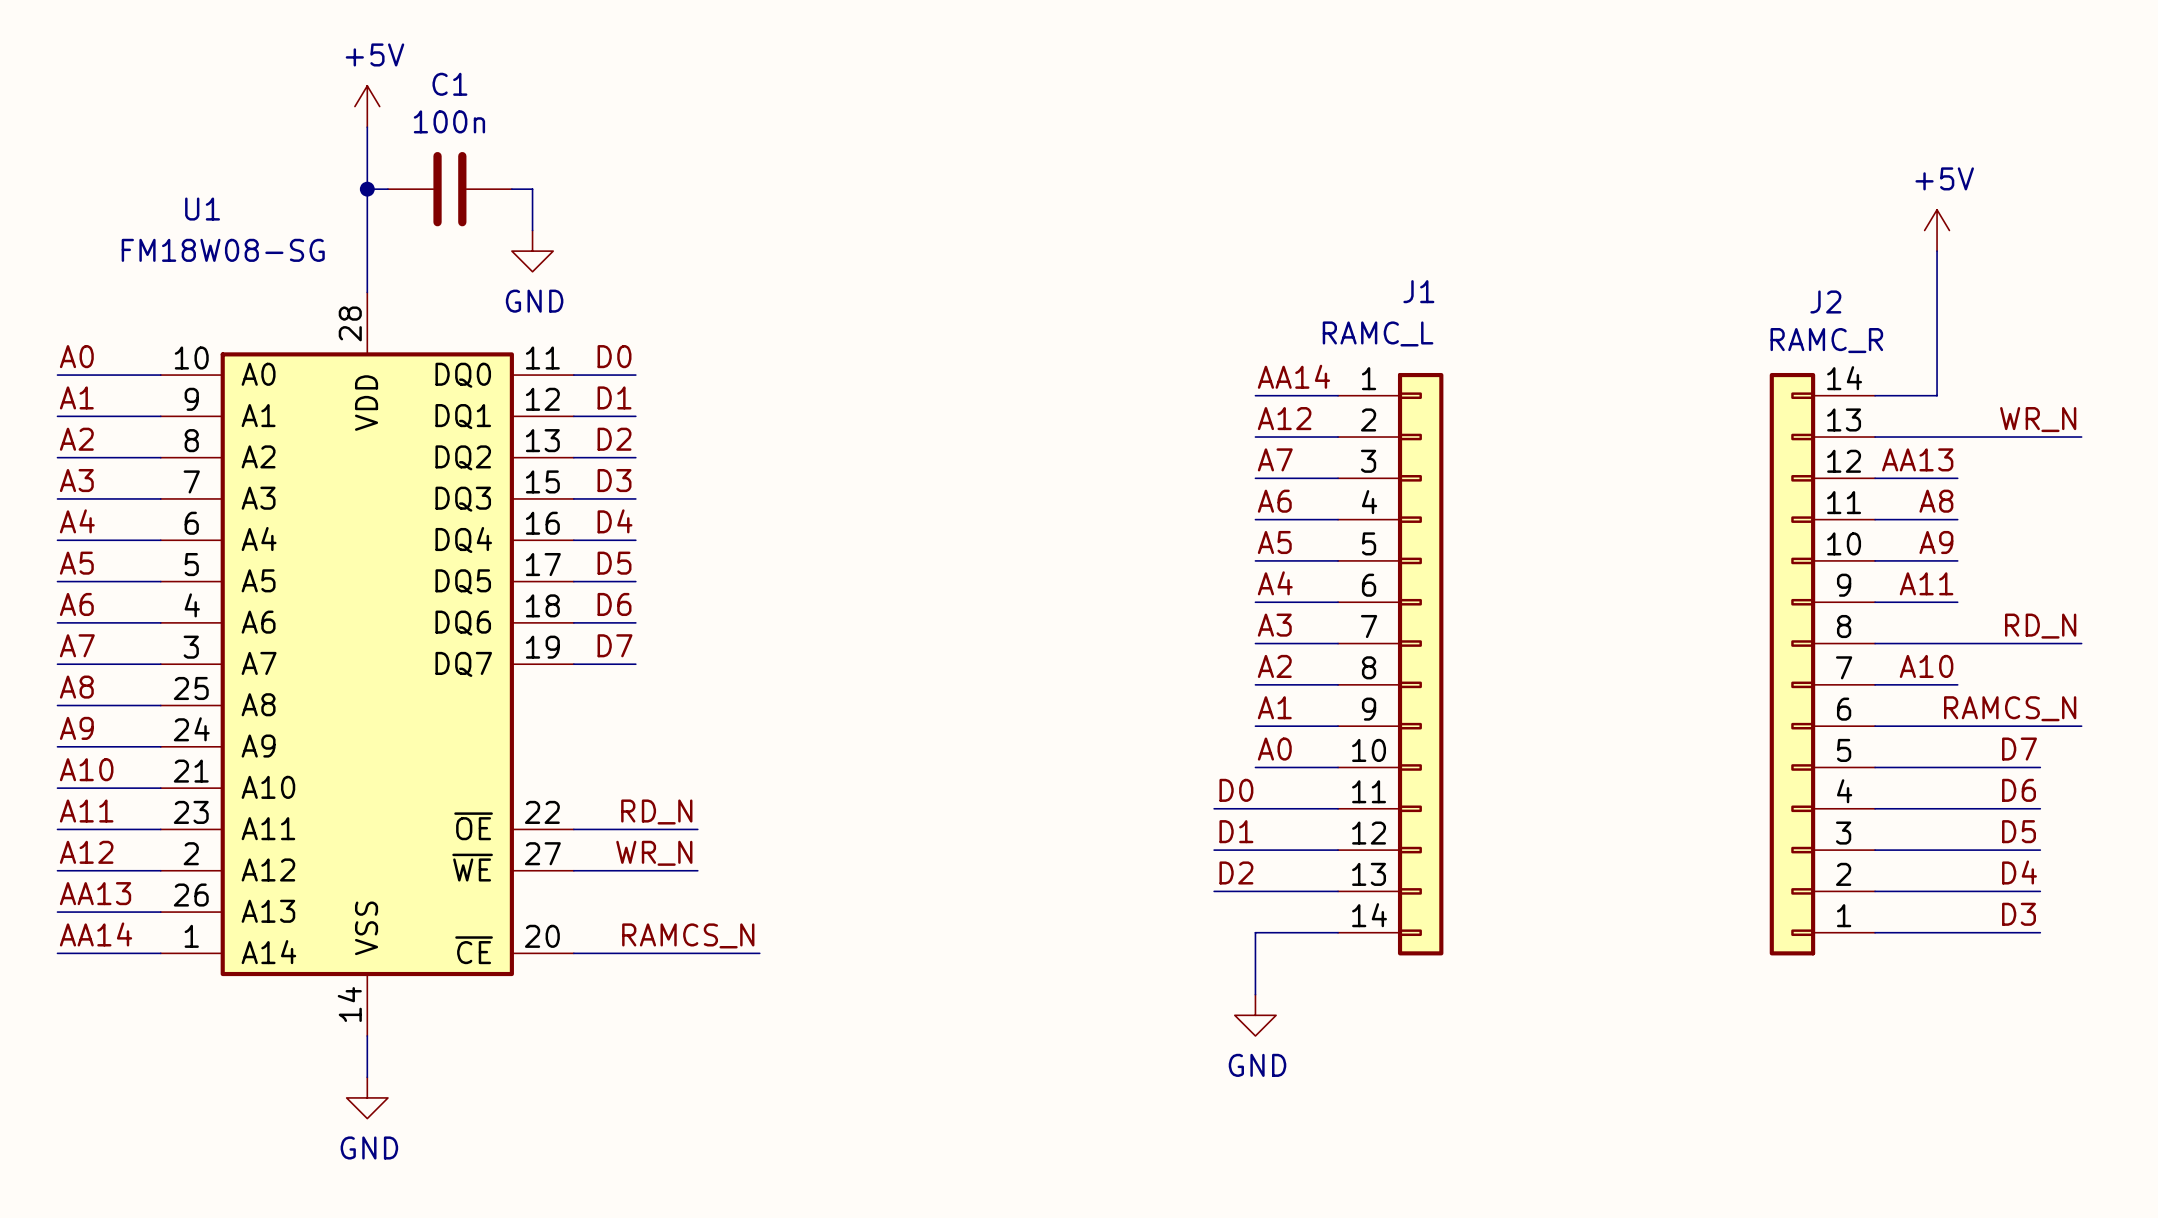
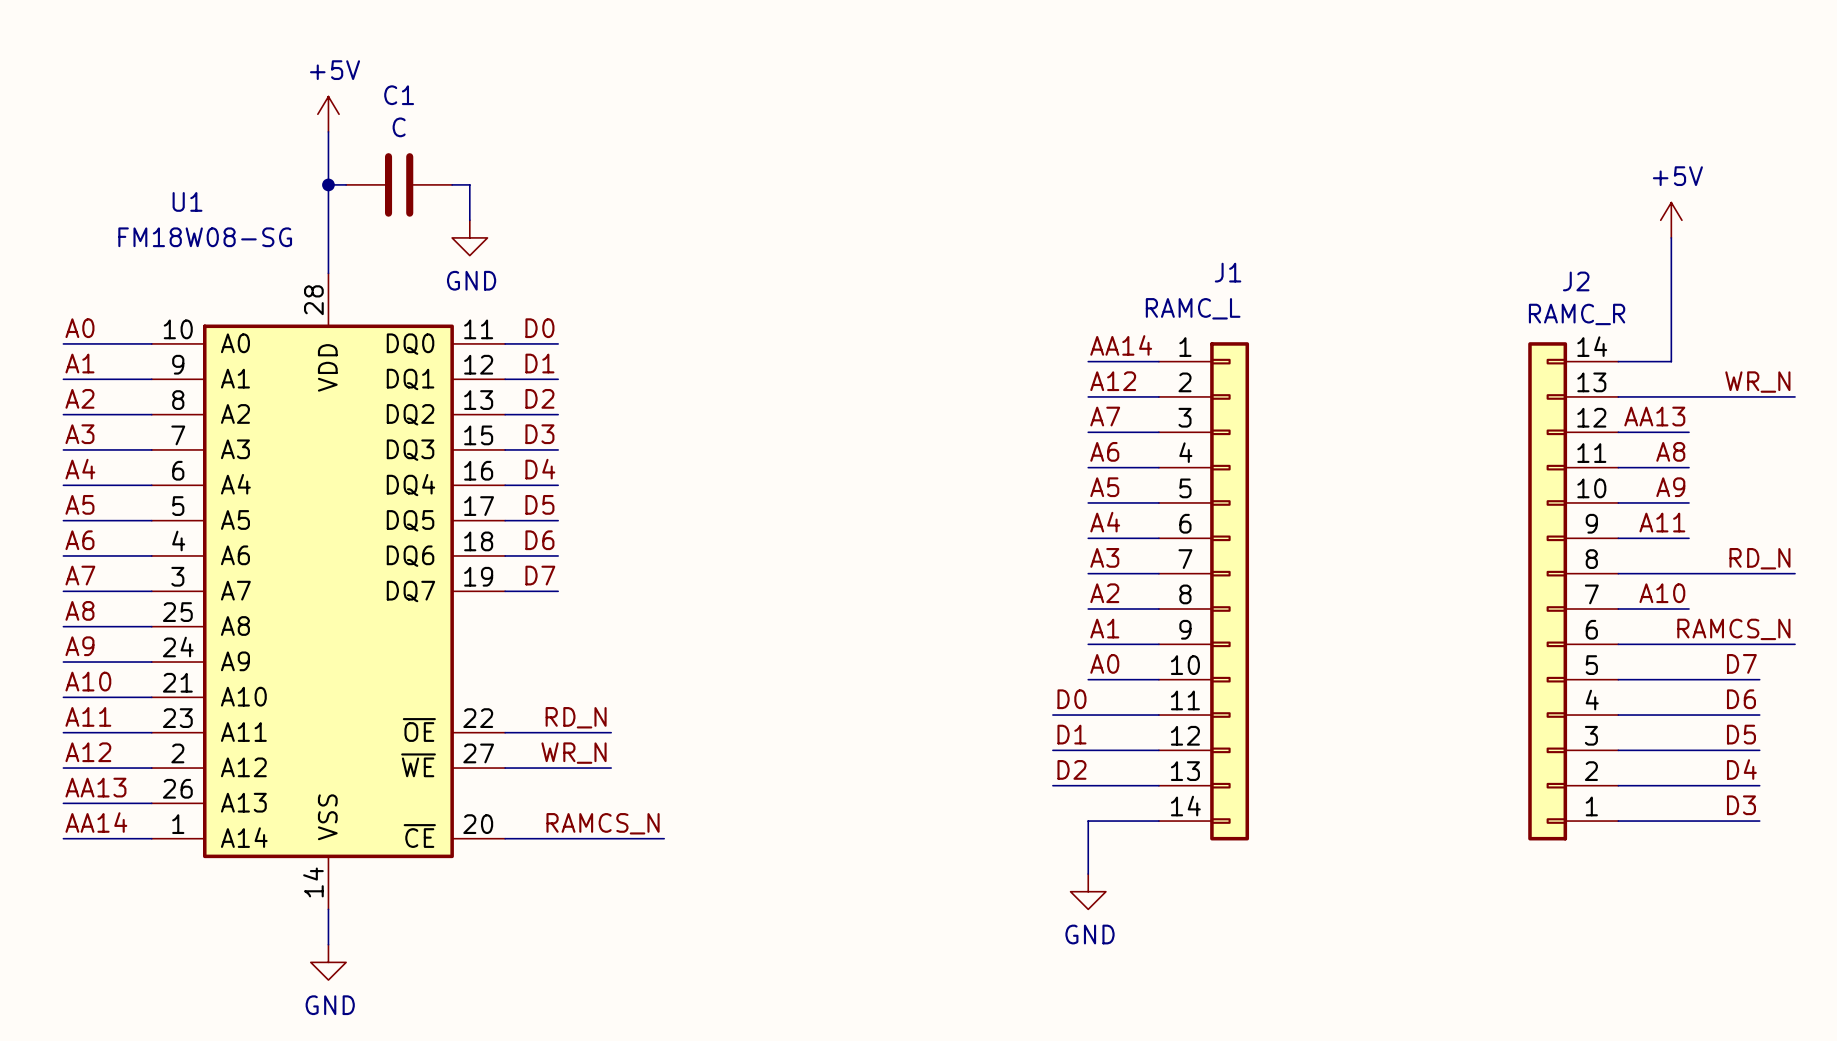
C1 value: 100n (449, 121) -> C (399, 127)

